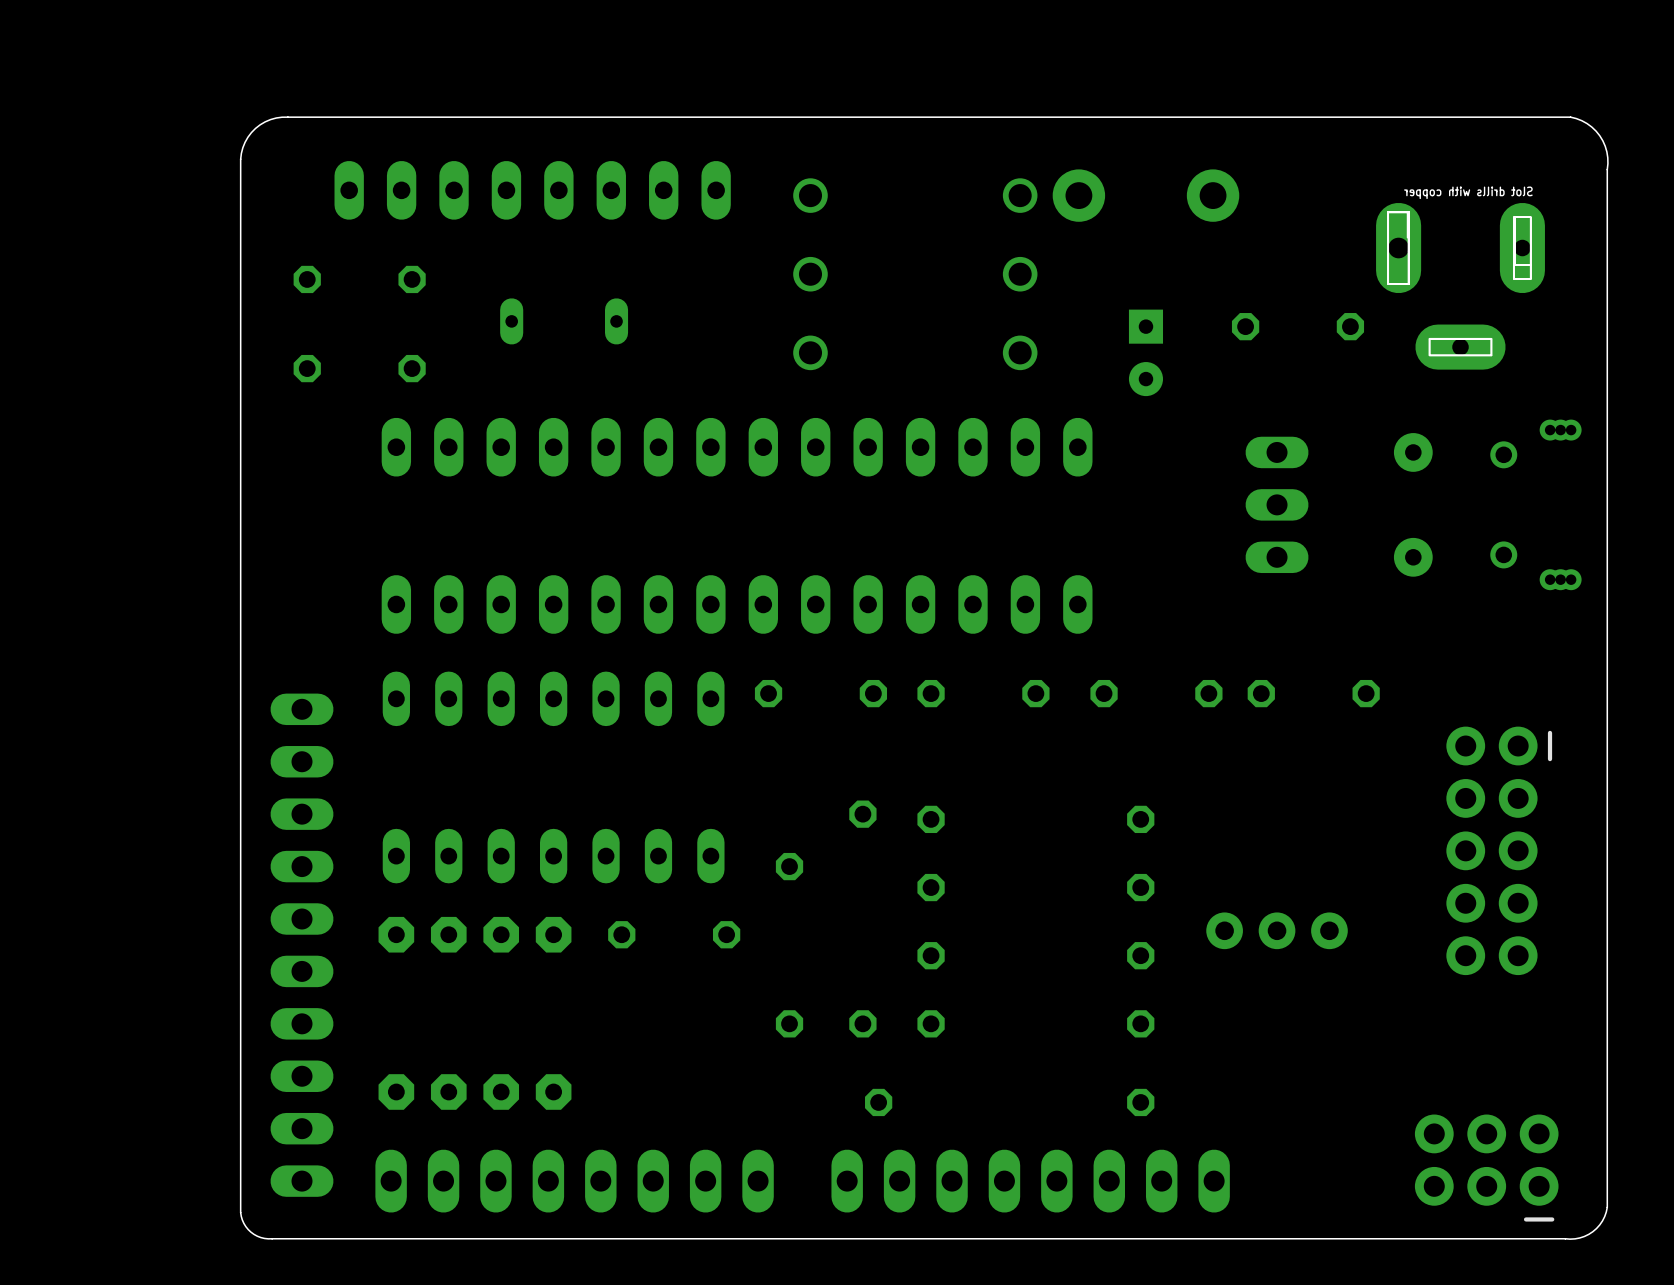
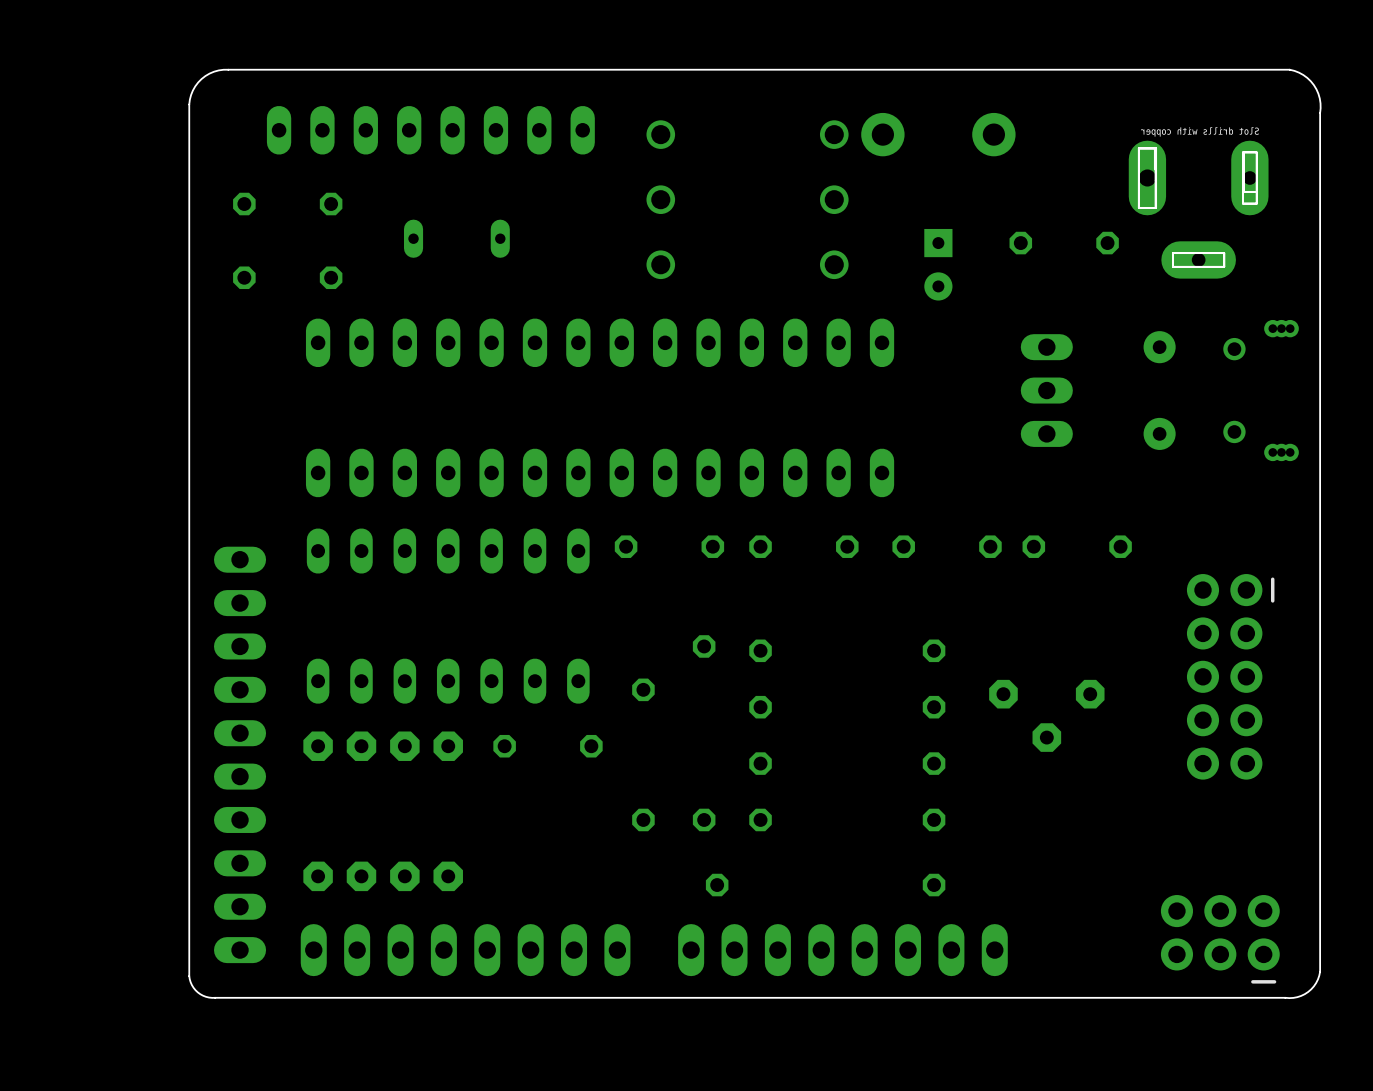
part: none -> (1046, 715)
part: (1277, 930) -> none

